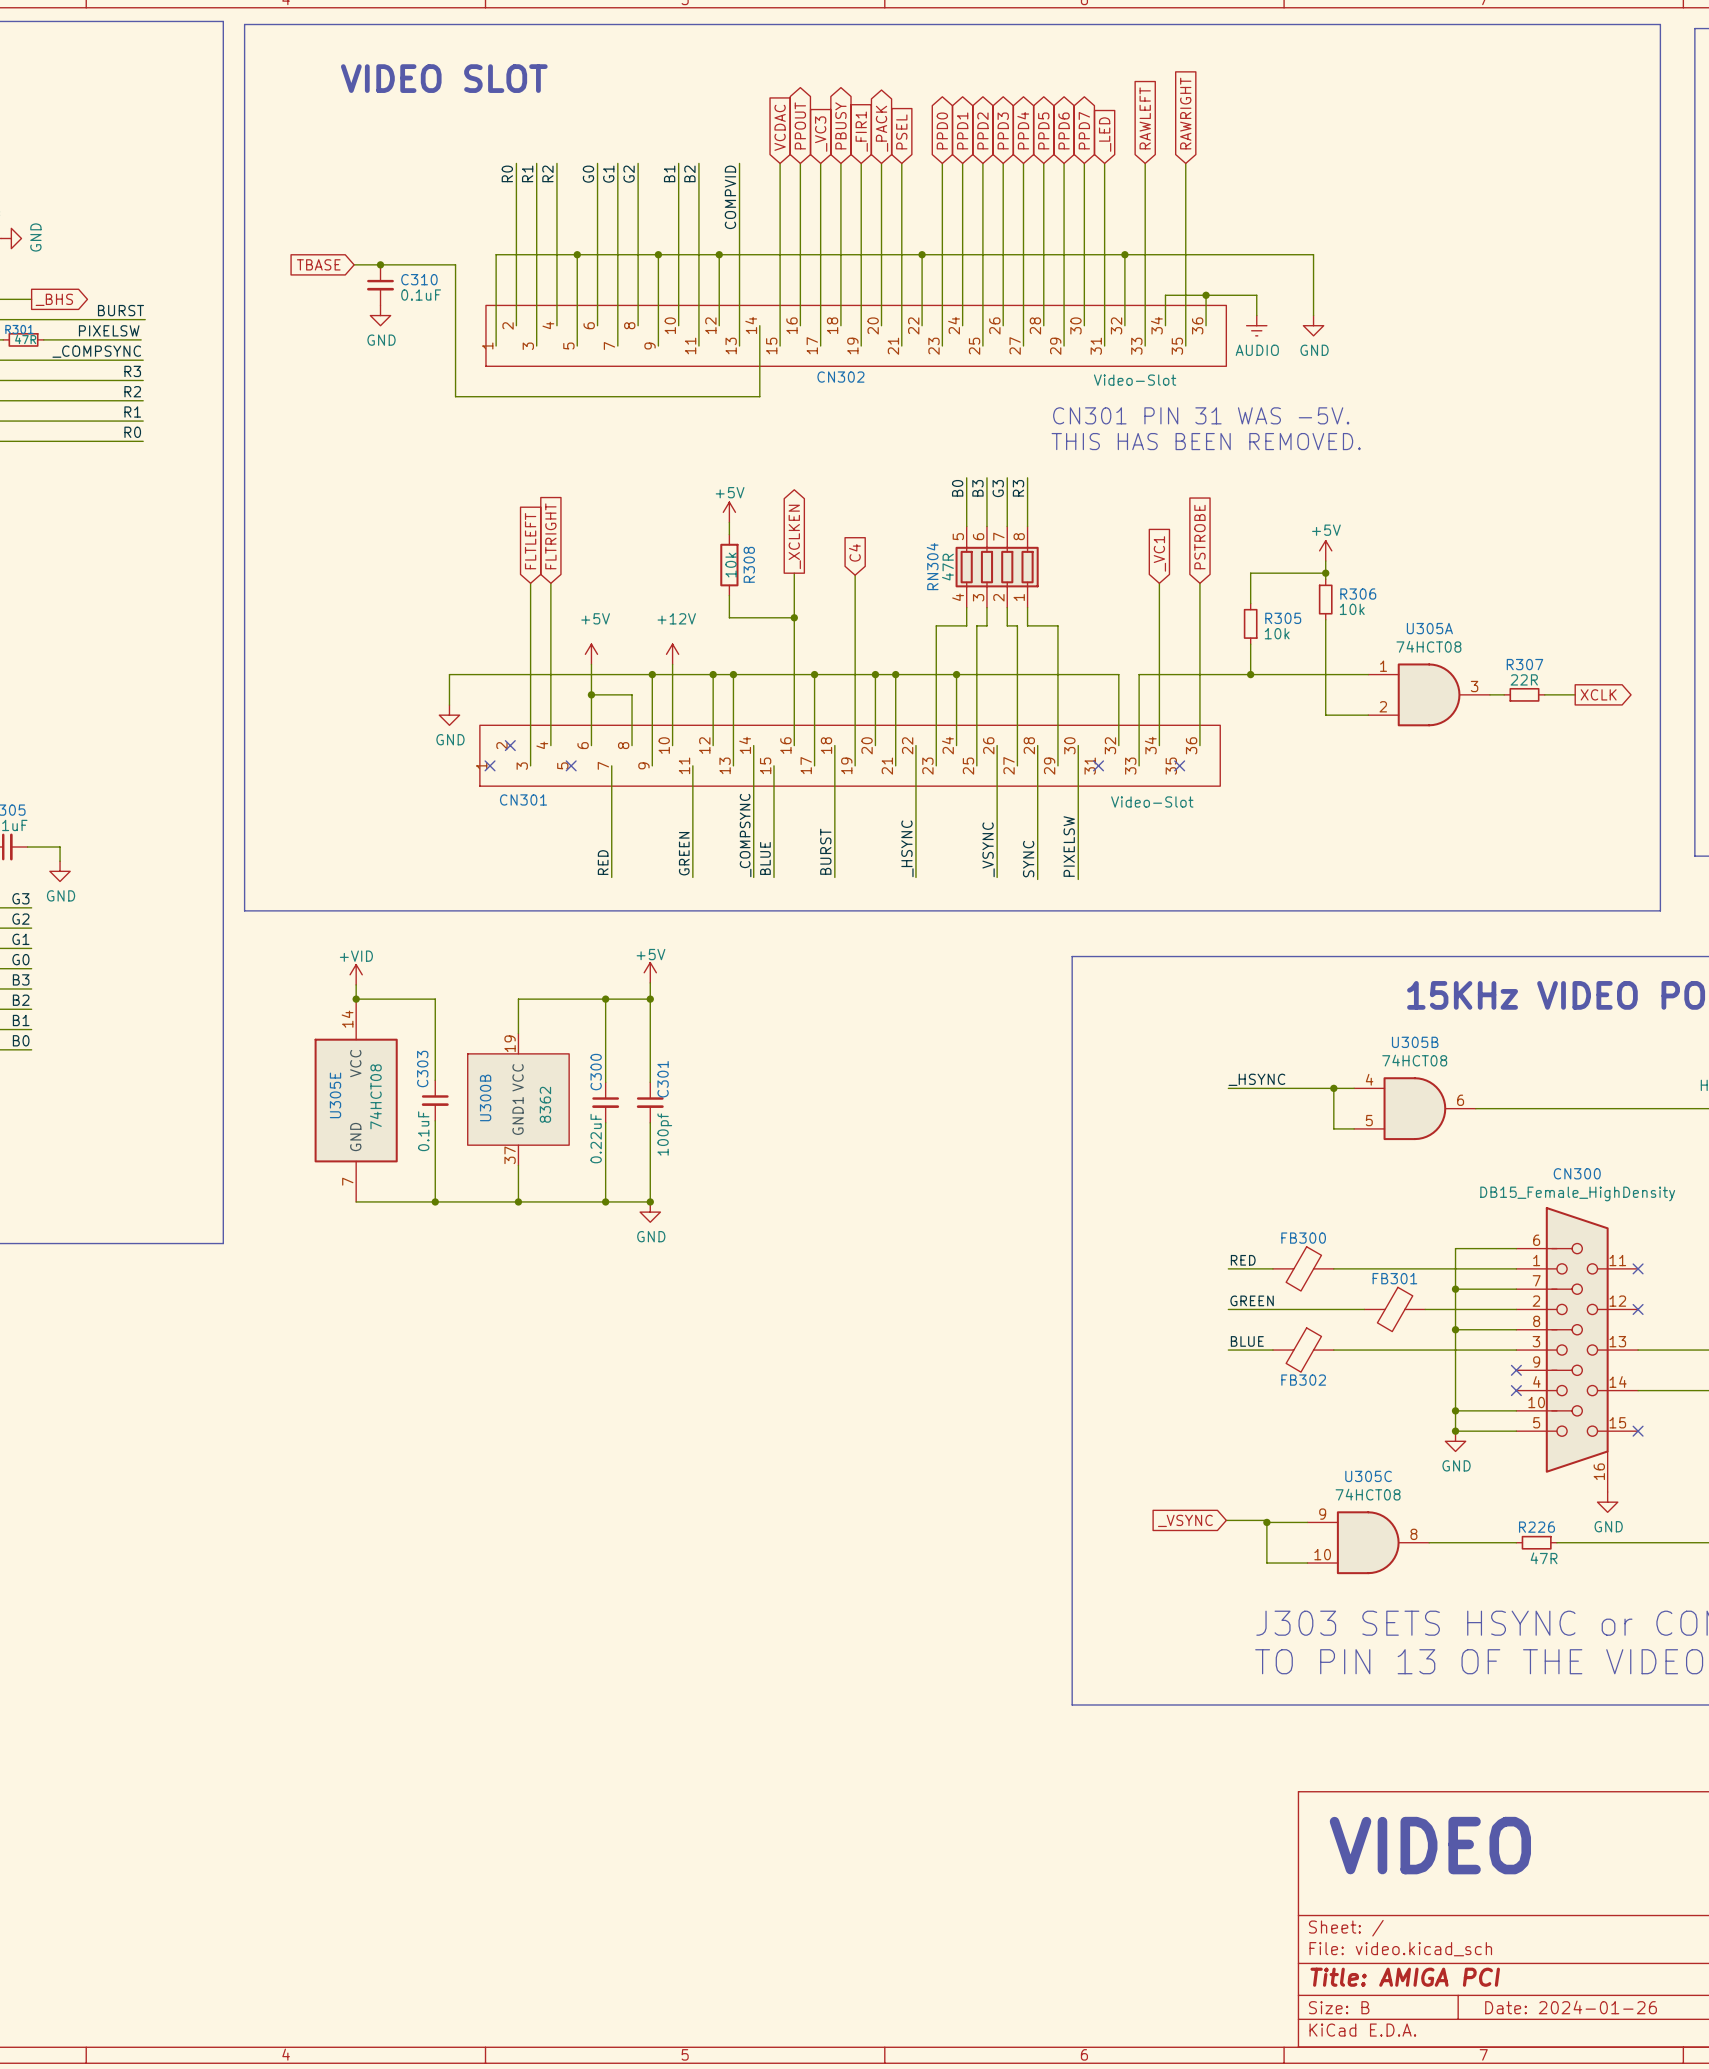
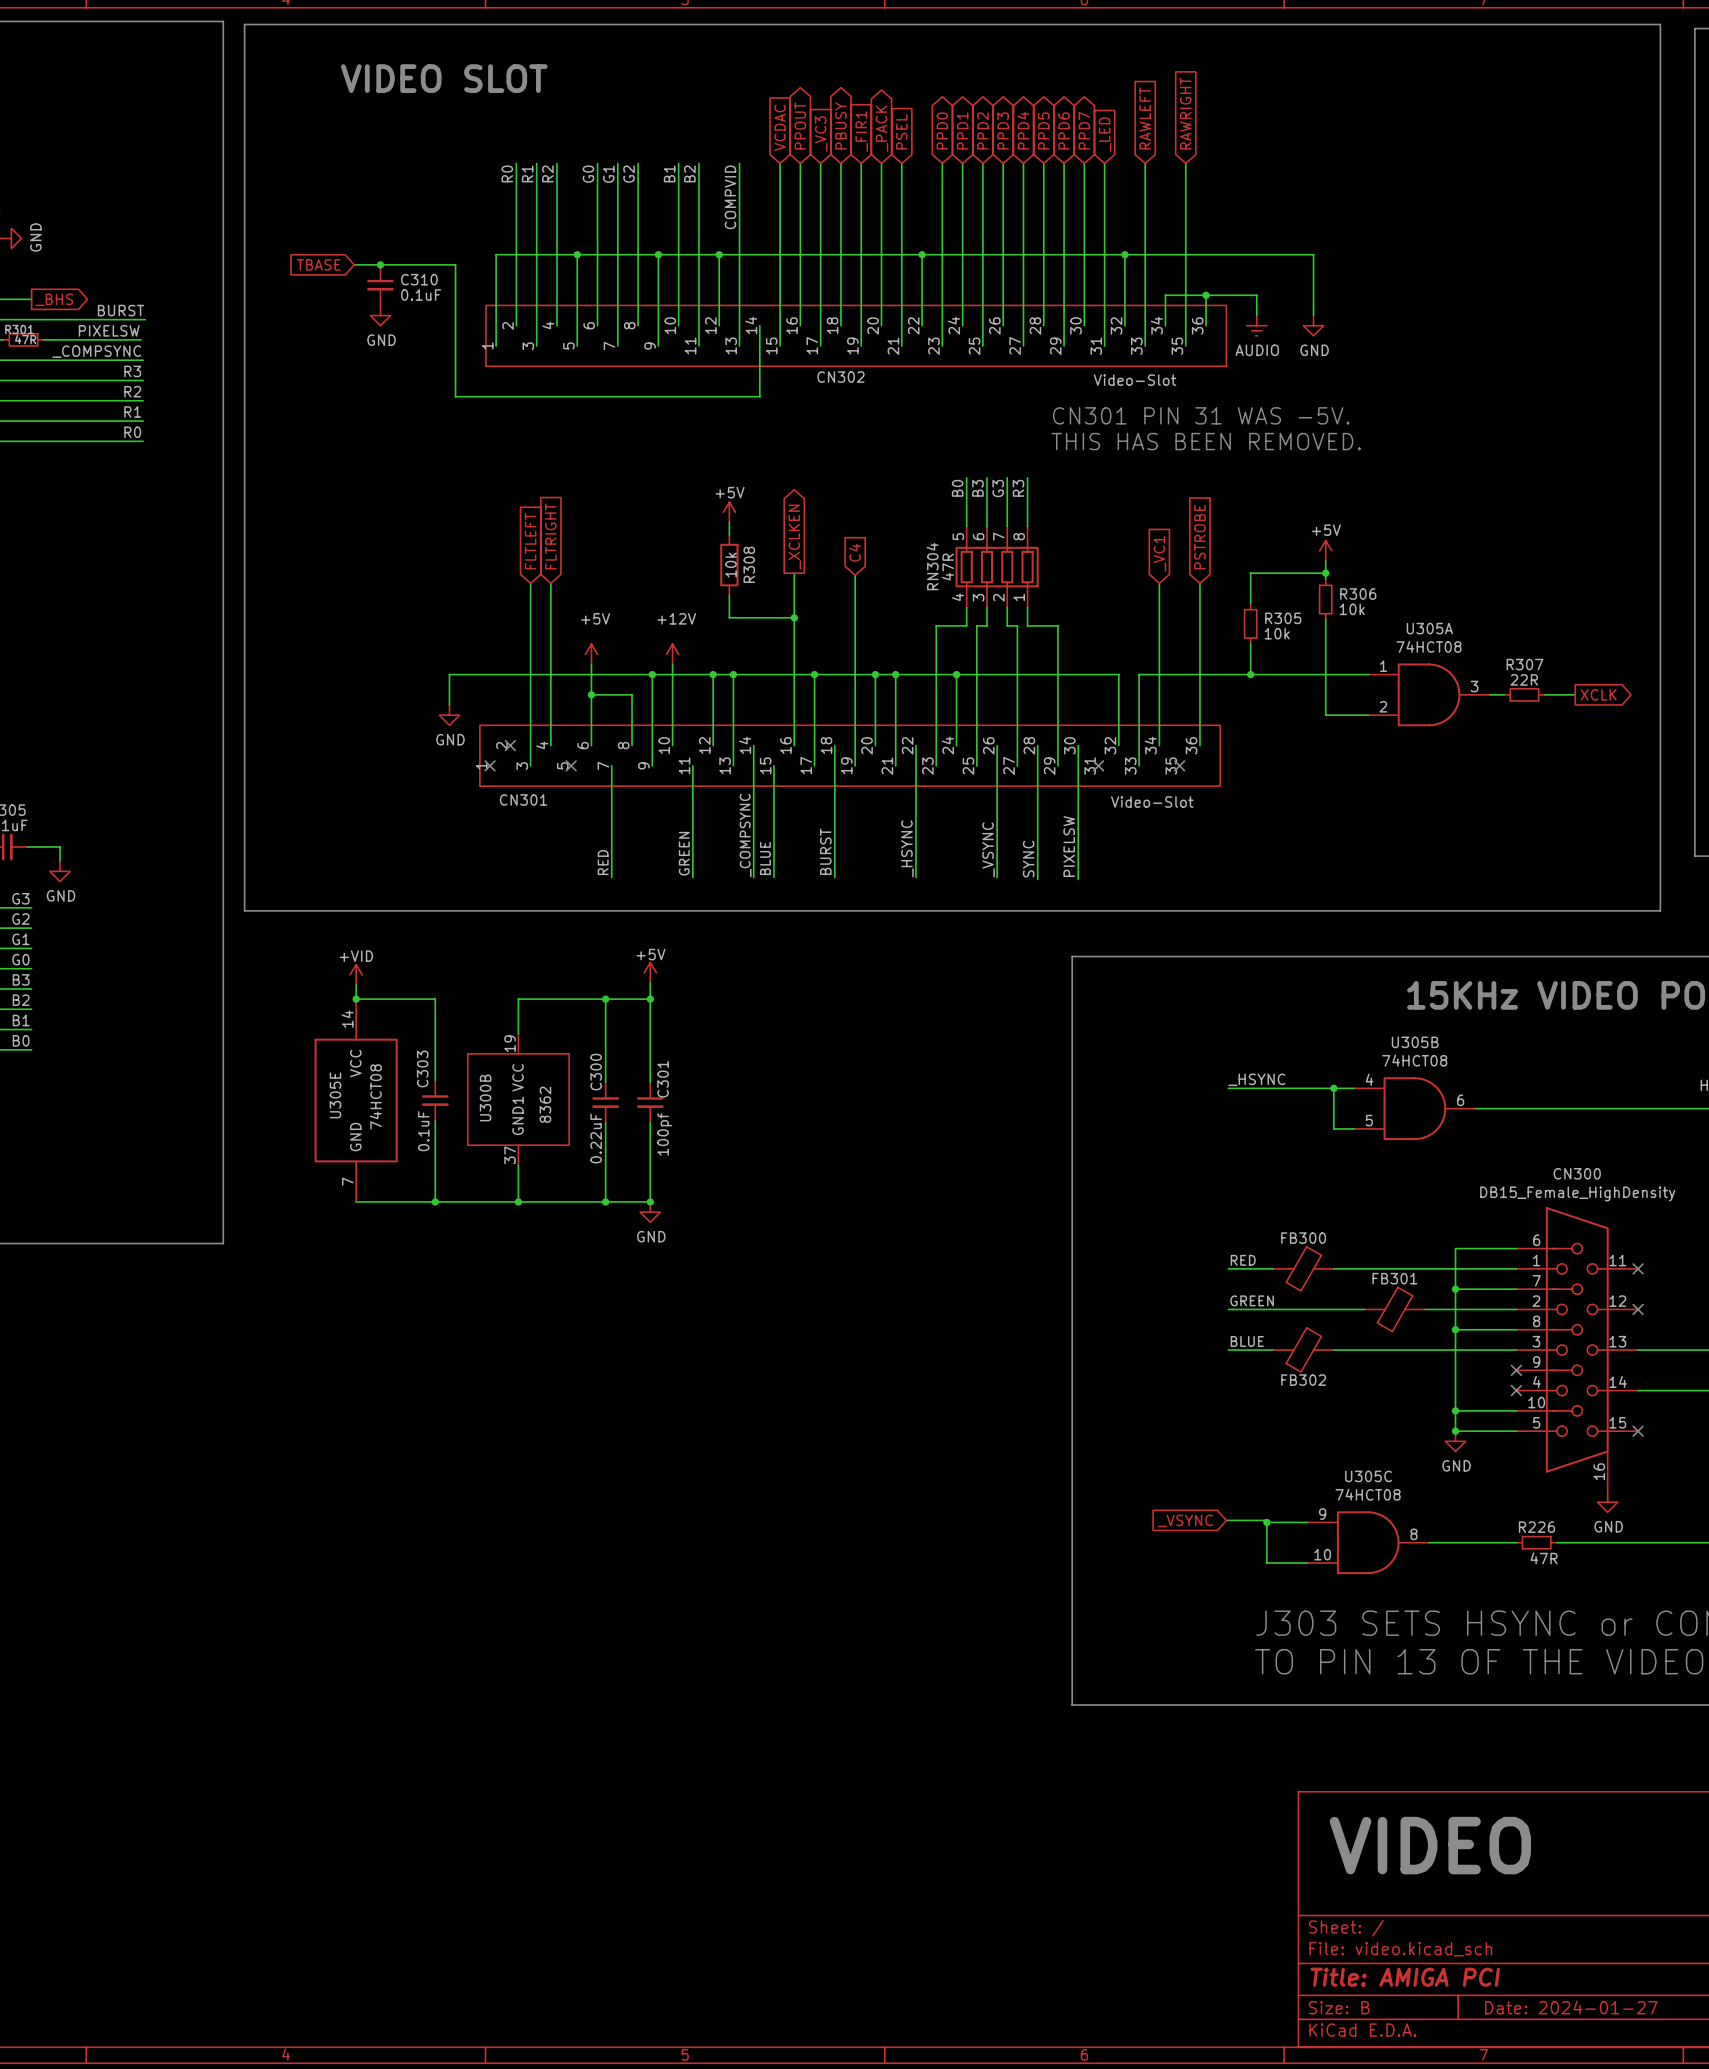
title block: Date: 2024-01-26 (1571, 2007) -> Date: 2024-01-27 (1571, 2007)

